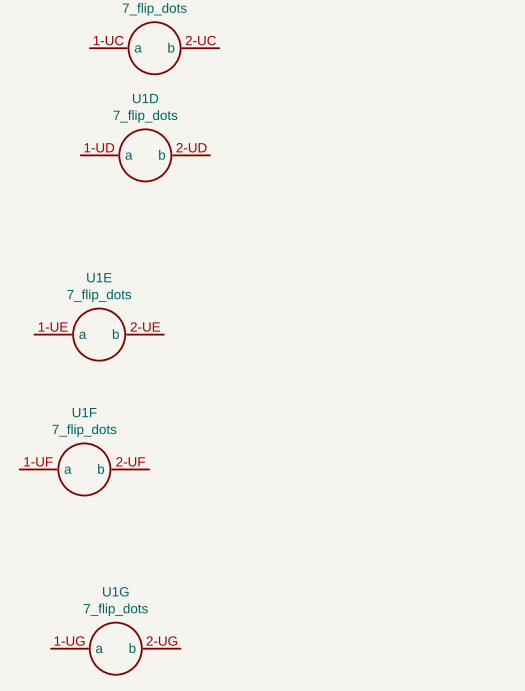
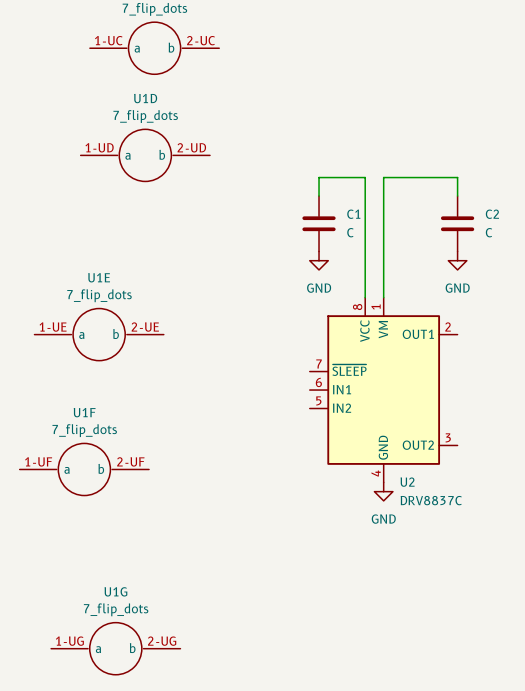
wire: none -> (319, 196) (319, 177) (365, 177) (365, 297)
wire: none -> (457, 196) (457, 177) (383, 177) (383, 297)
C1: none -> C (319, 223)
C2: none -> C (457, 223)
power symbol: none -> GND (319, 260)
power symbol: none -> GND (457, 260)
U2: none -> DRV8837C (383, 390)
power symbol: none -> GND (383, 491)

